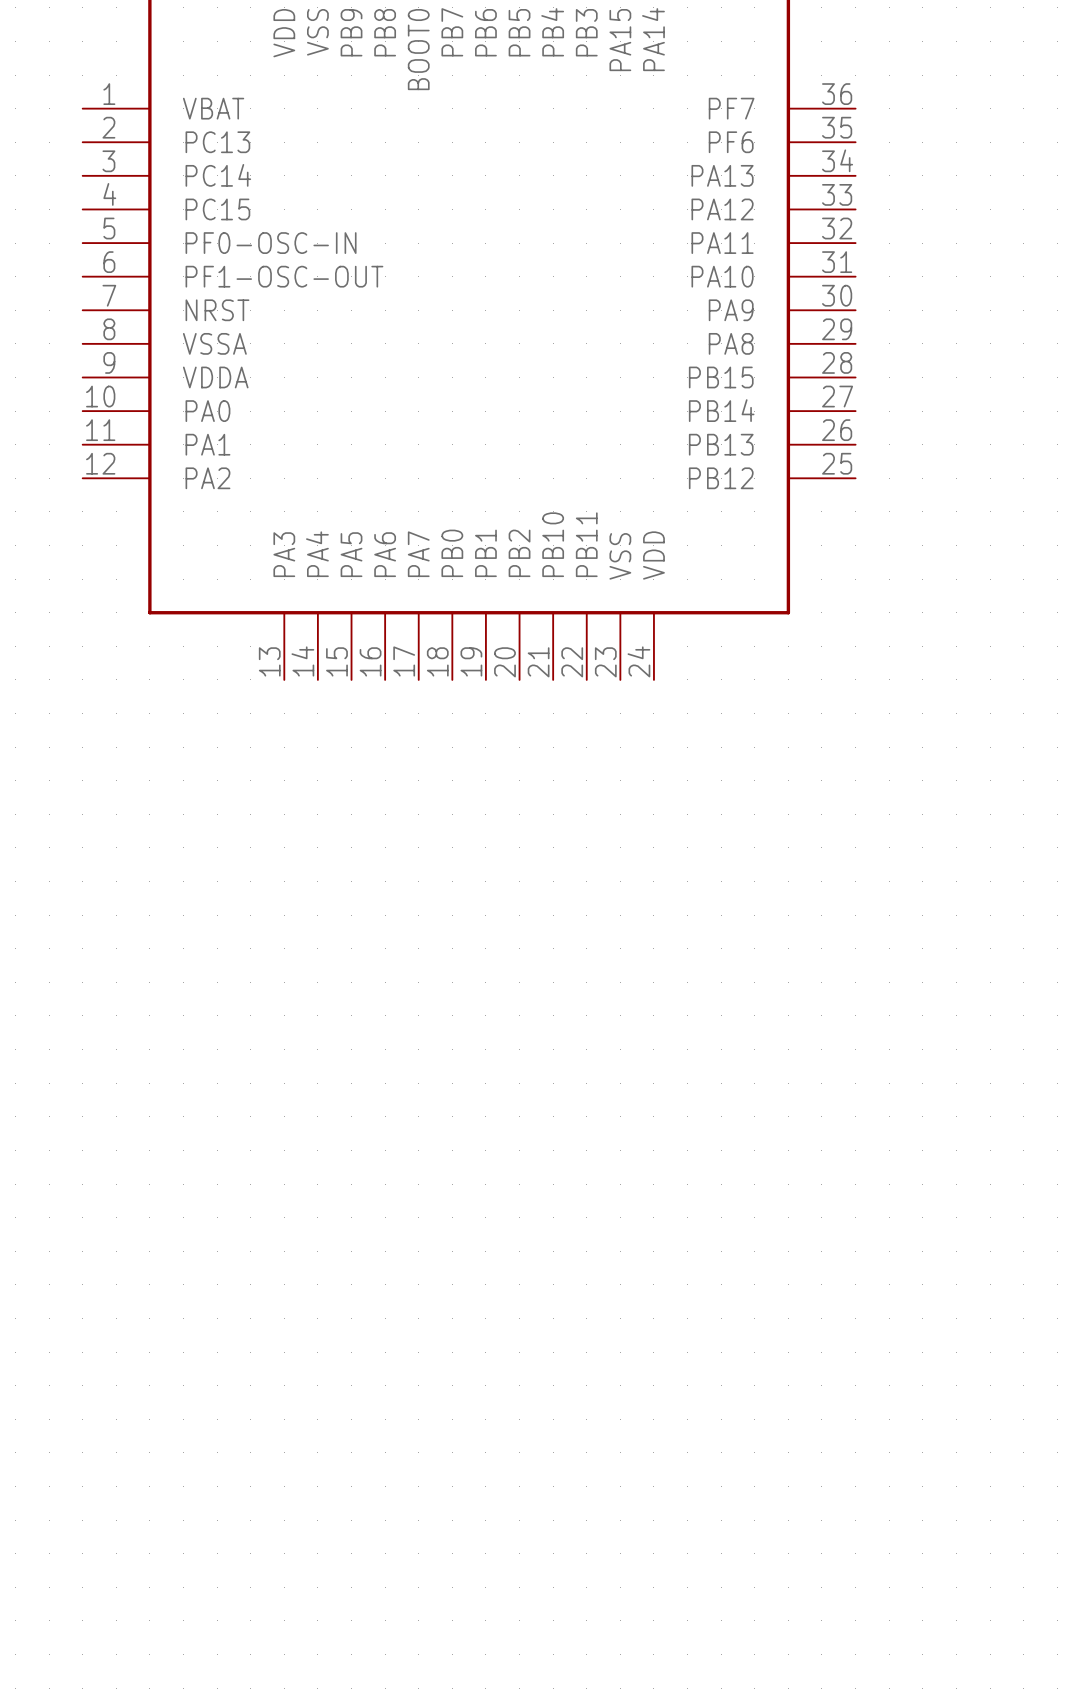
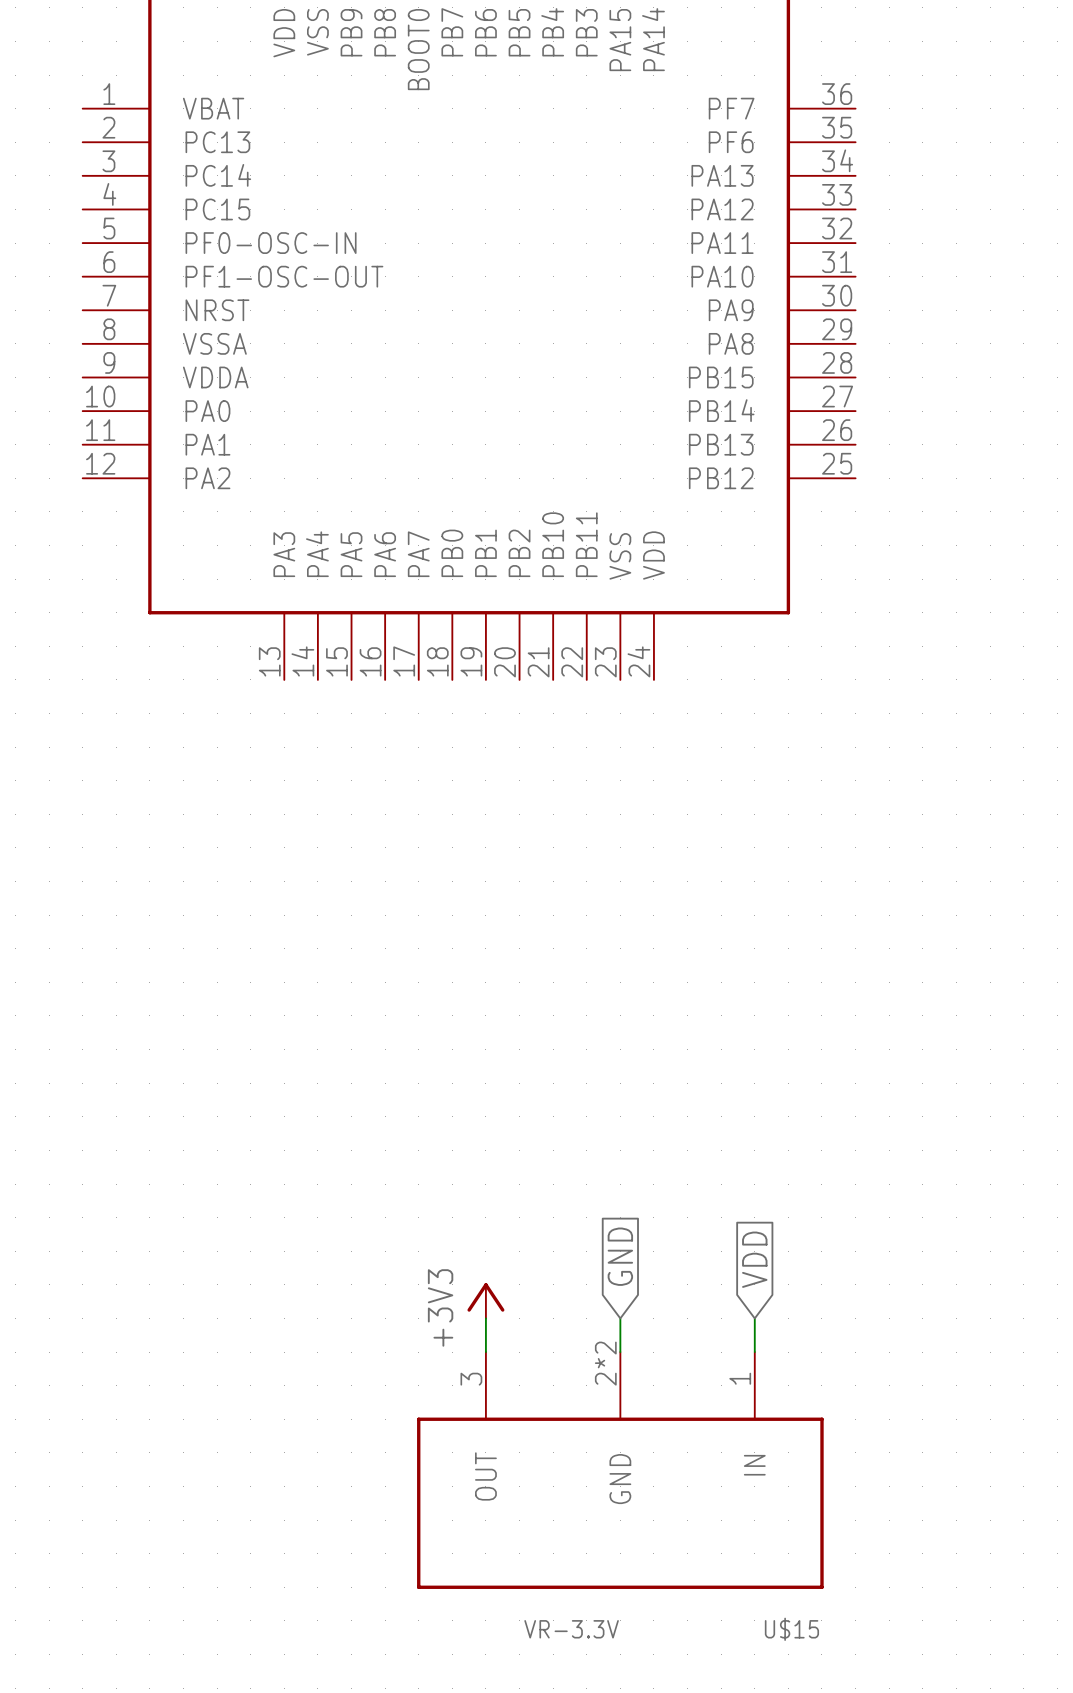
global label: none -> GND (620, 1256)
global label: none -> VDD (754, 1259)
power symbol: none -> +3V3 (485, 1300)
wire: none -> (485, 1318) (485, 1352)
wire: none -> (620, 1318) (620, 1352)
wire: none -> (754, 1318) (754, 1352)
U$15: none -> VR-3.3V (620, 1470)

